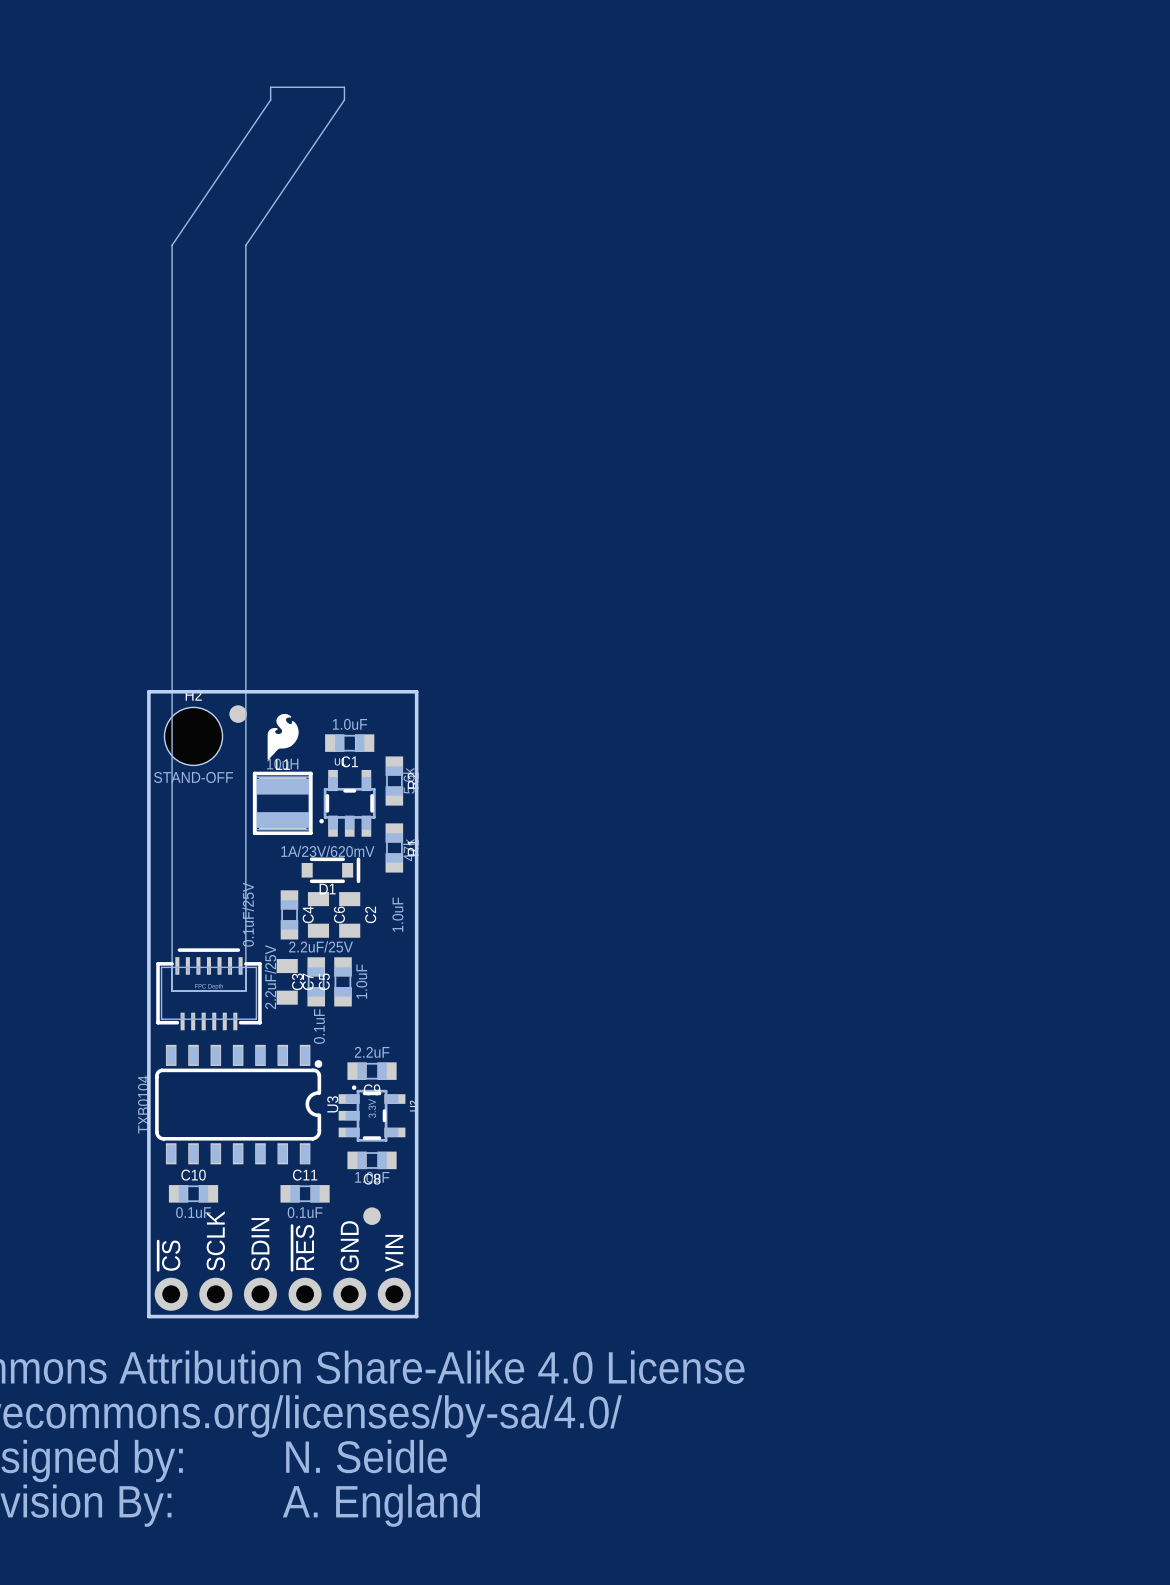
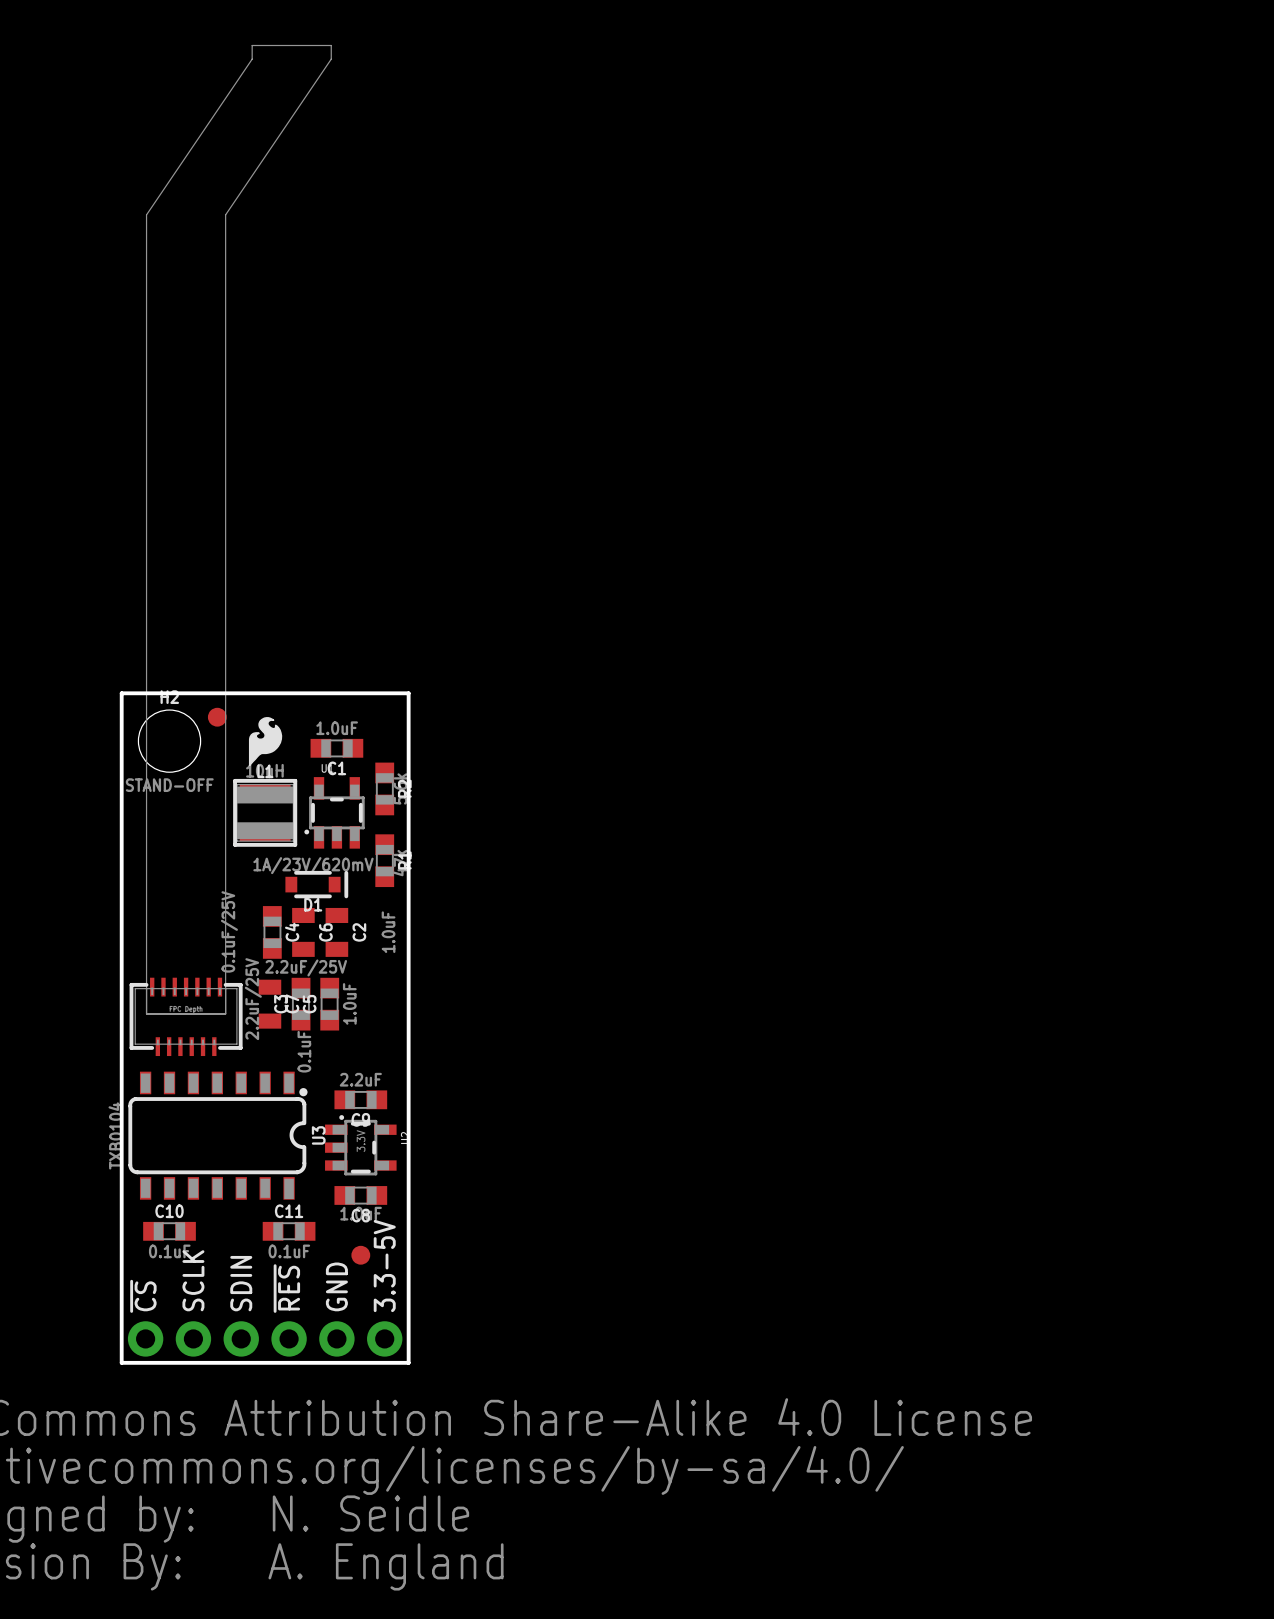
part footprint: [156, 87, 345, 1031] -> [129, 45, 332, 1057]
text: VIN (394, 1253) -> 3.3-5V (384, 1265)

